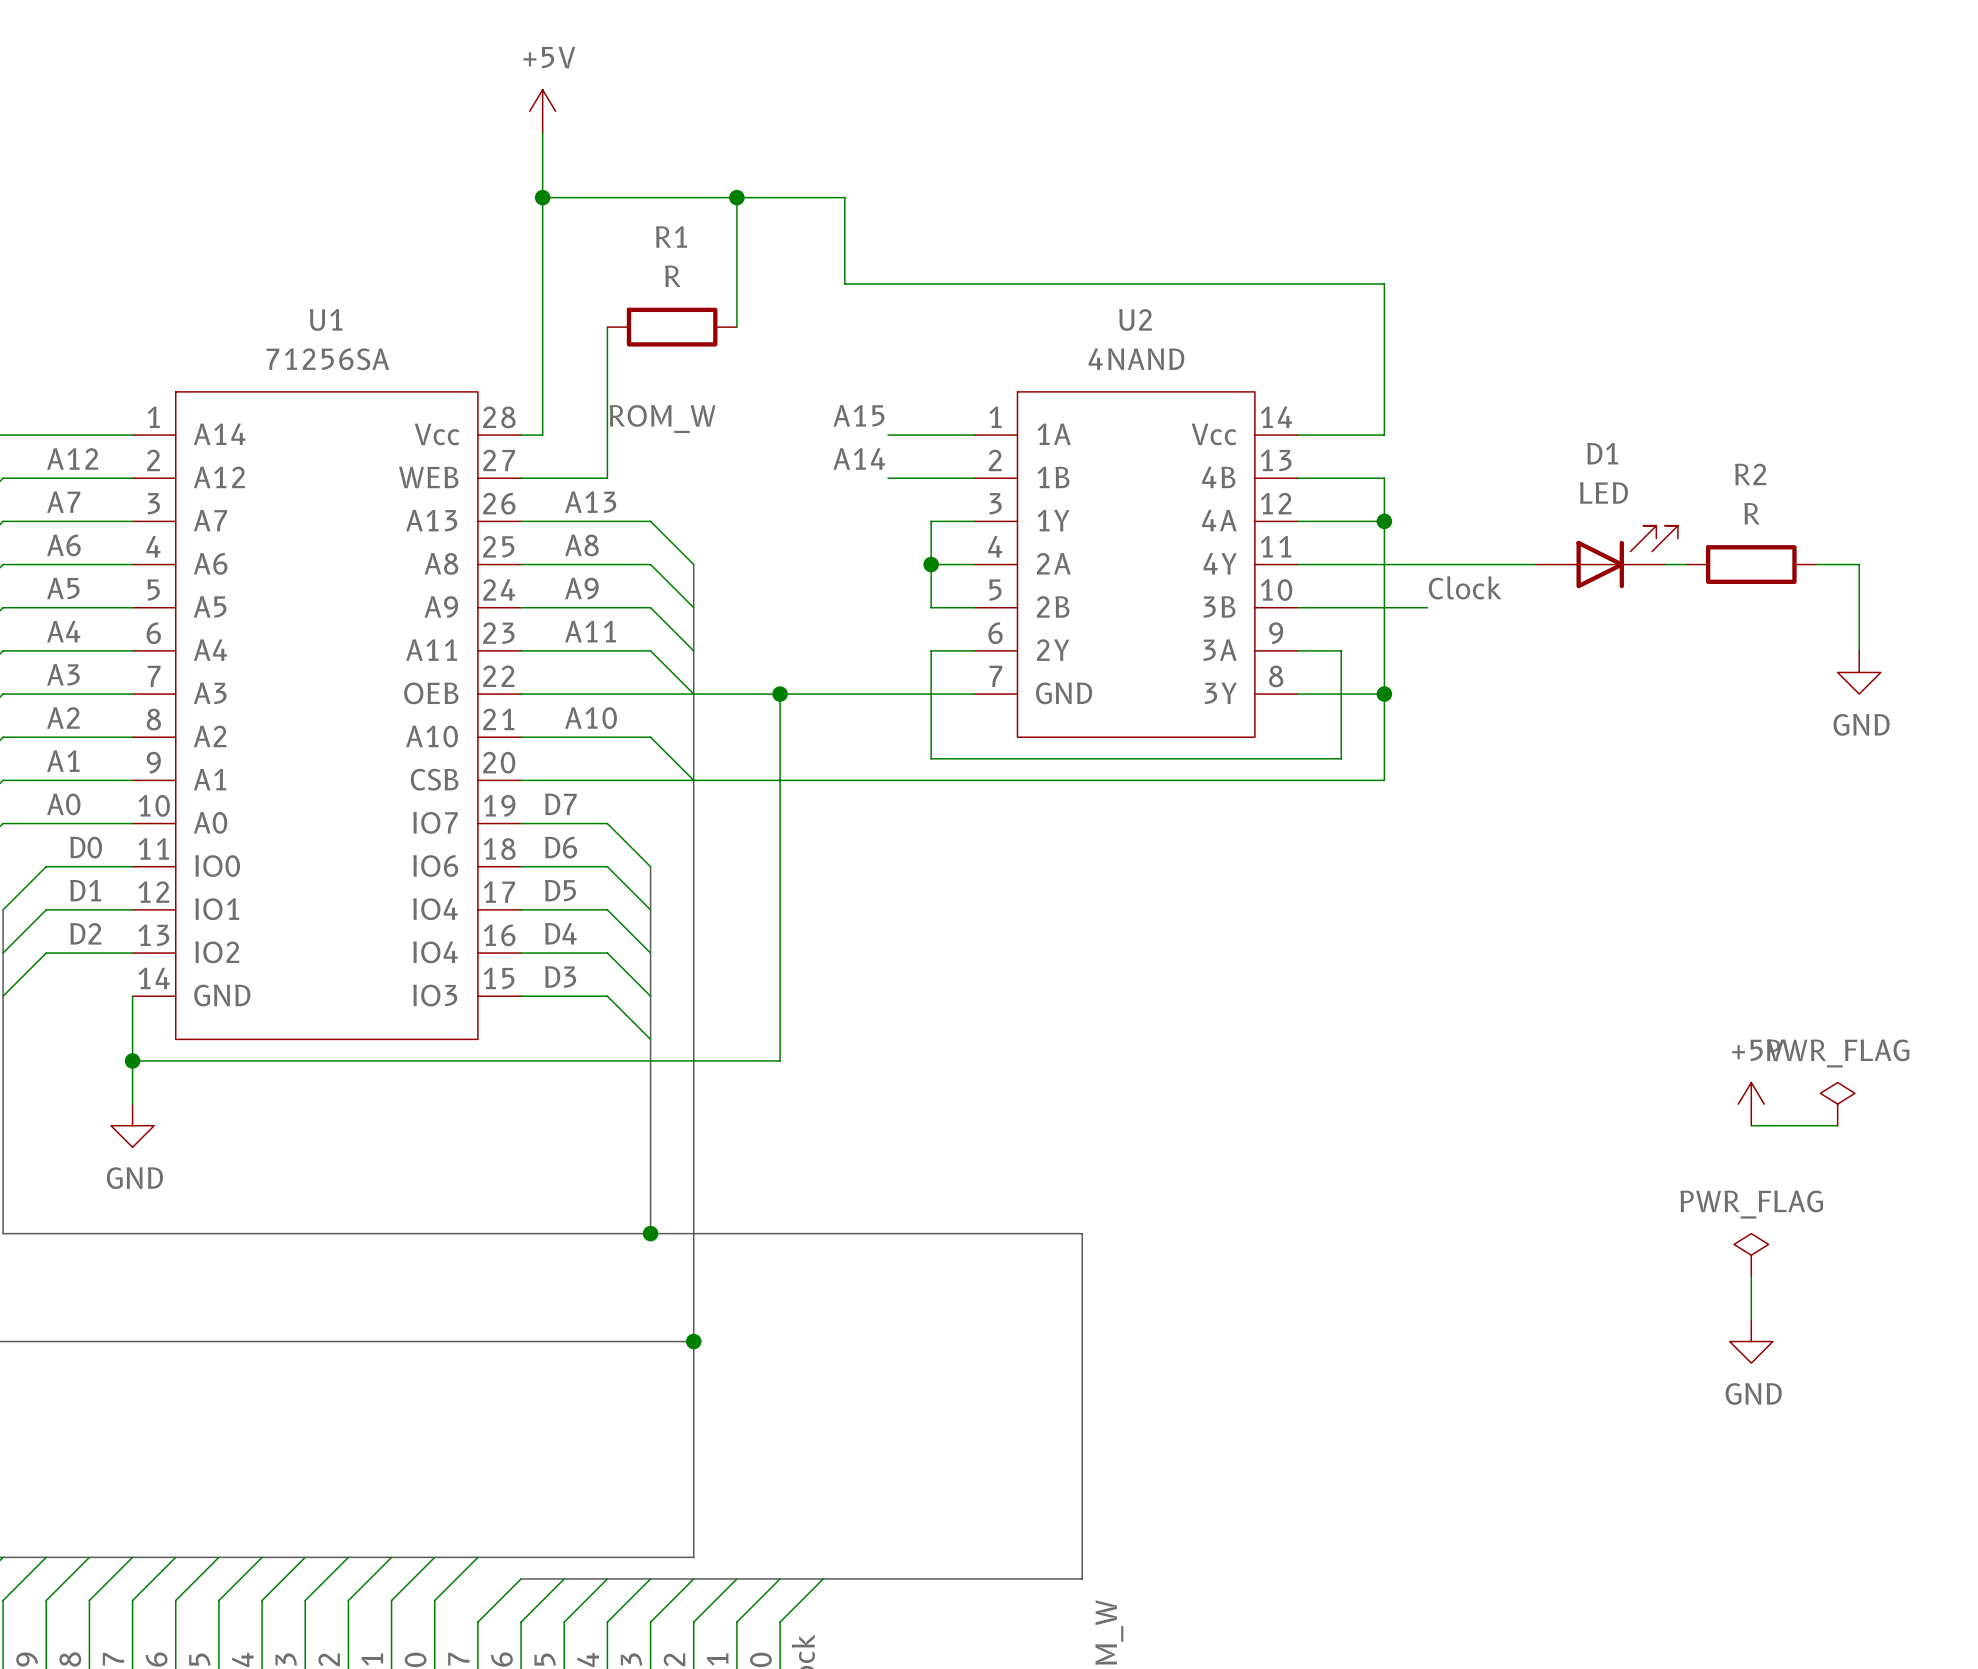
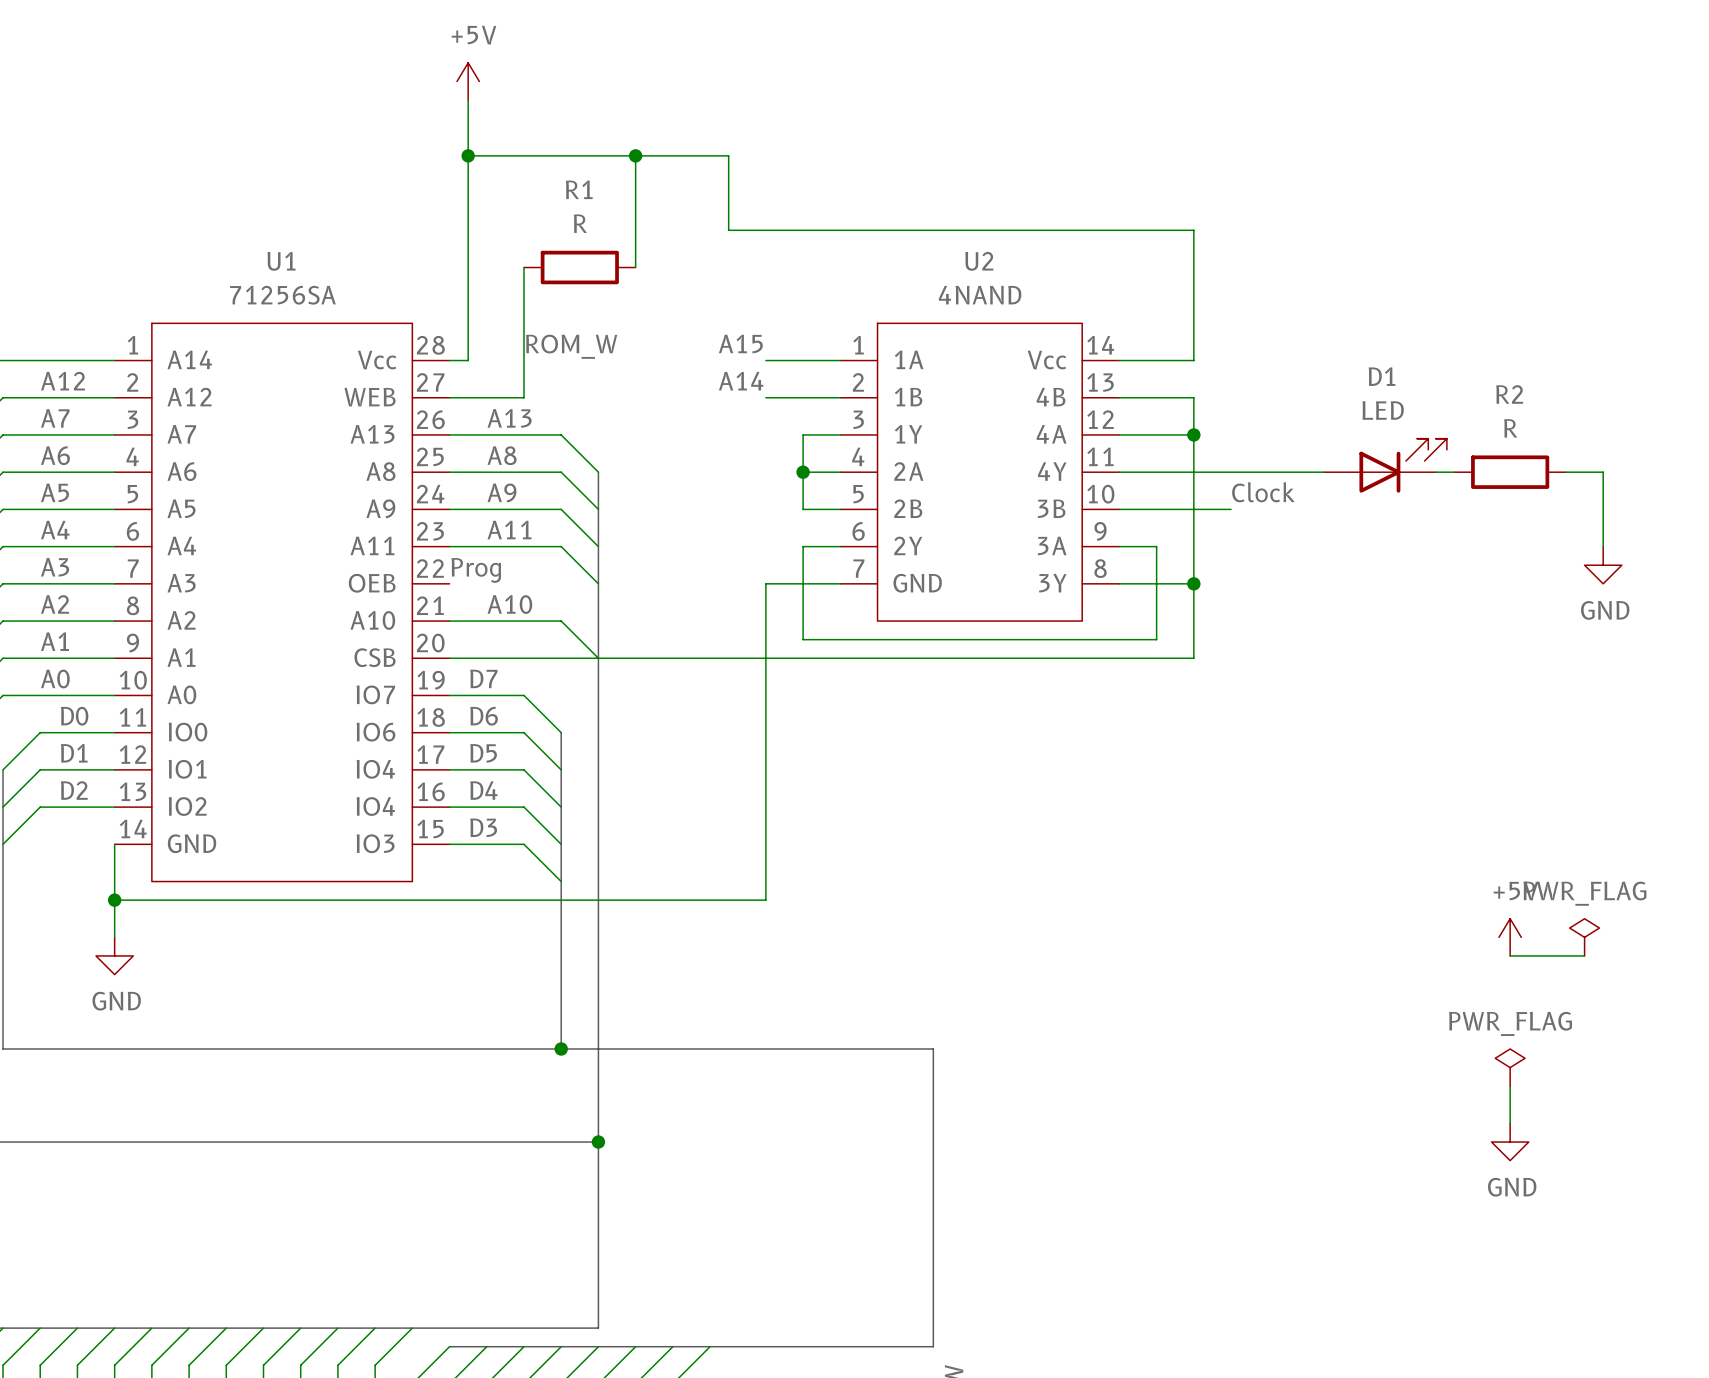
label: none -> Prog (476, 570)
wire: (521, 694) (887, 694) -> none
wire: (780, 694) (780, 1060) -> (765, 583) (765, 900) (672, 900)
junction: (780, 694) -> none

